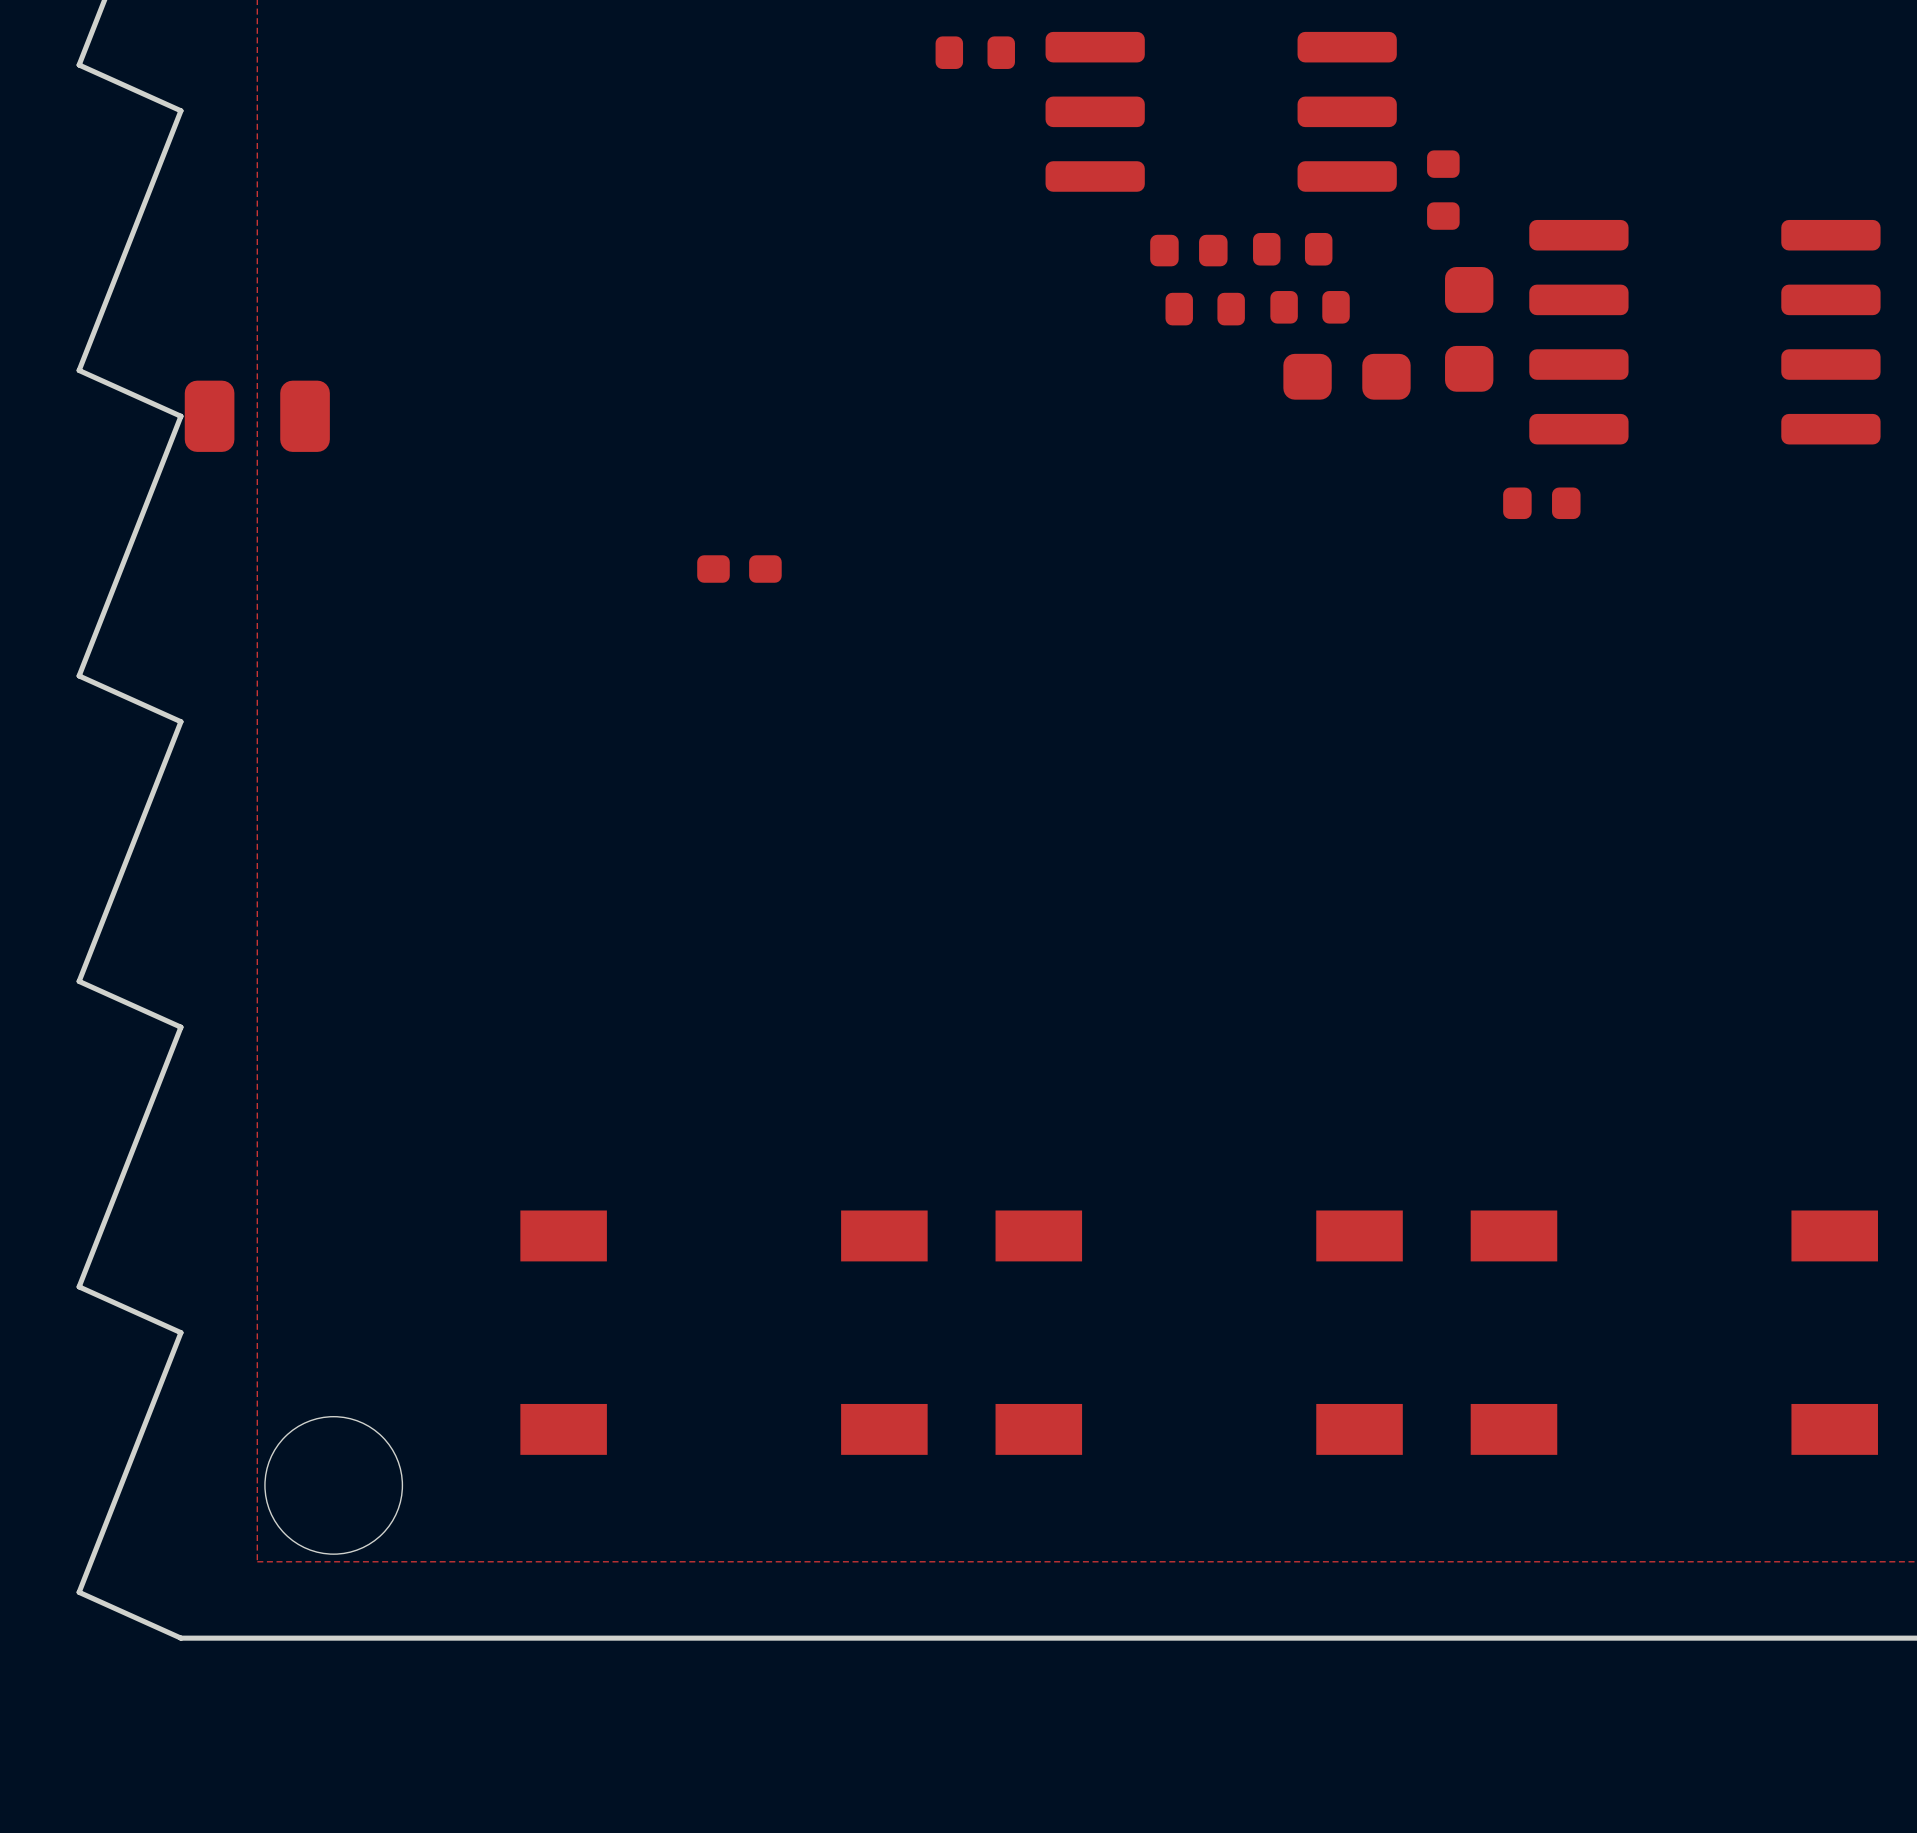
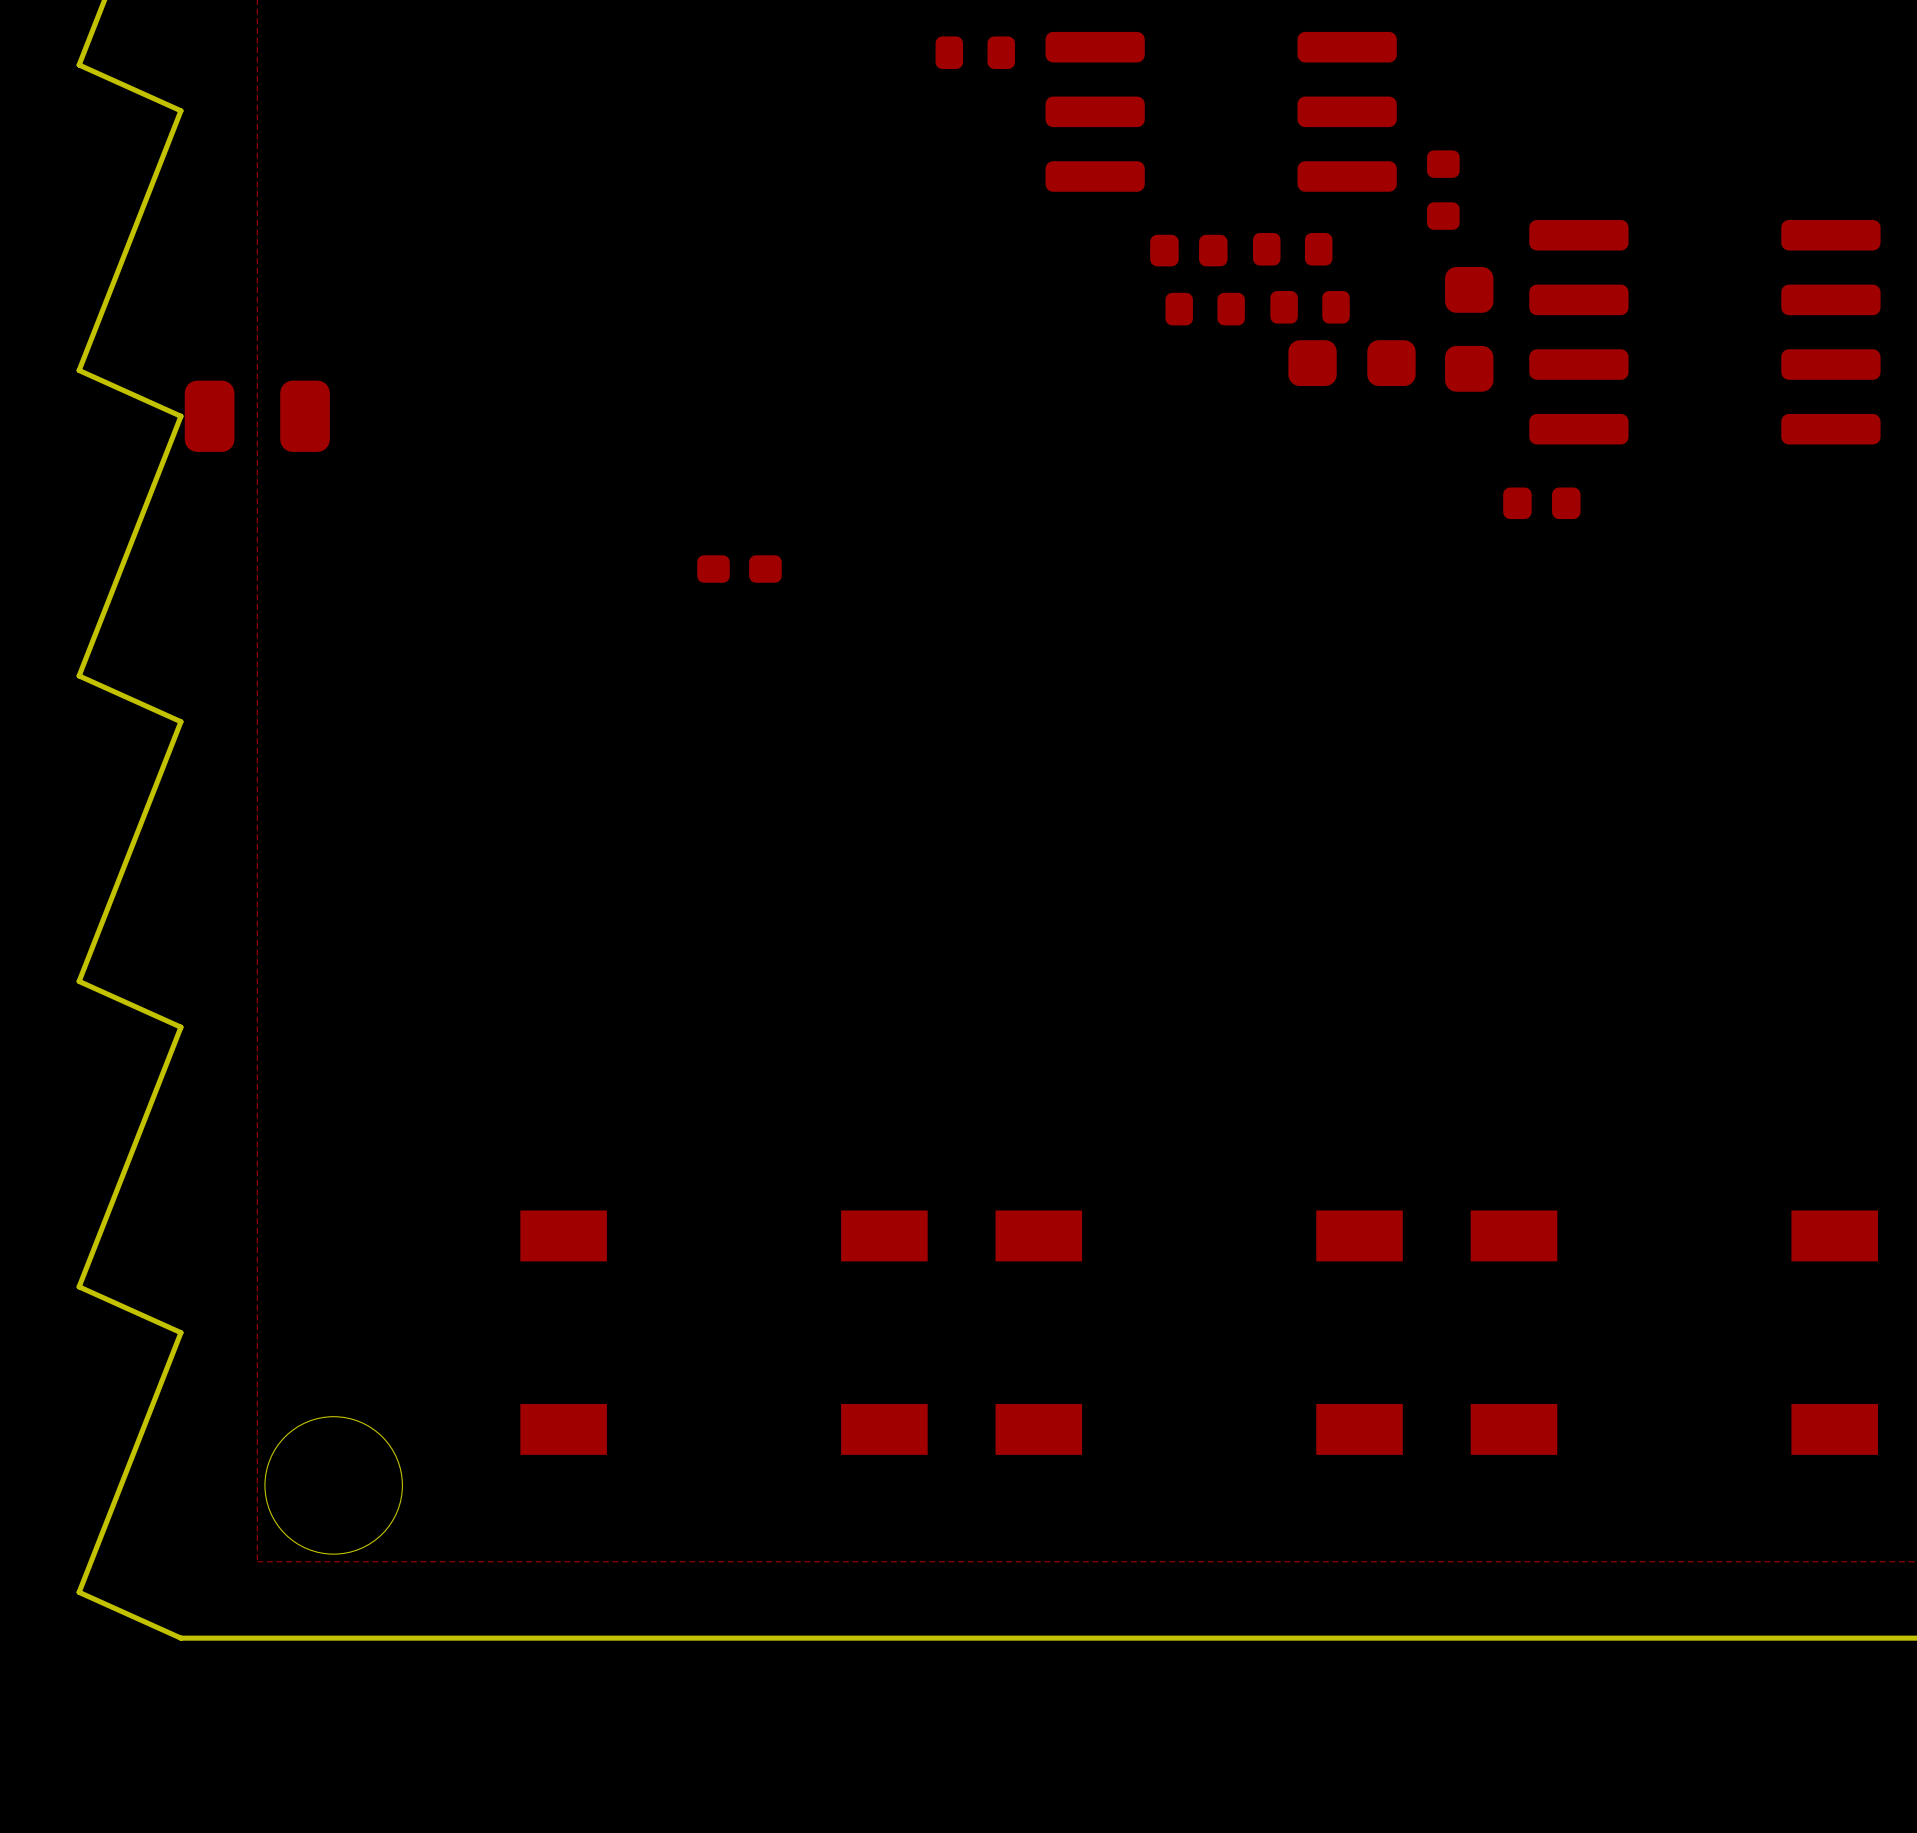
part position: (1347, 376) -> (1352, 363)

